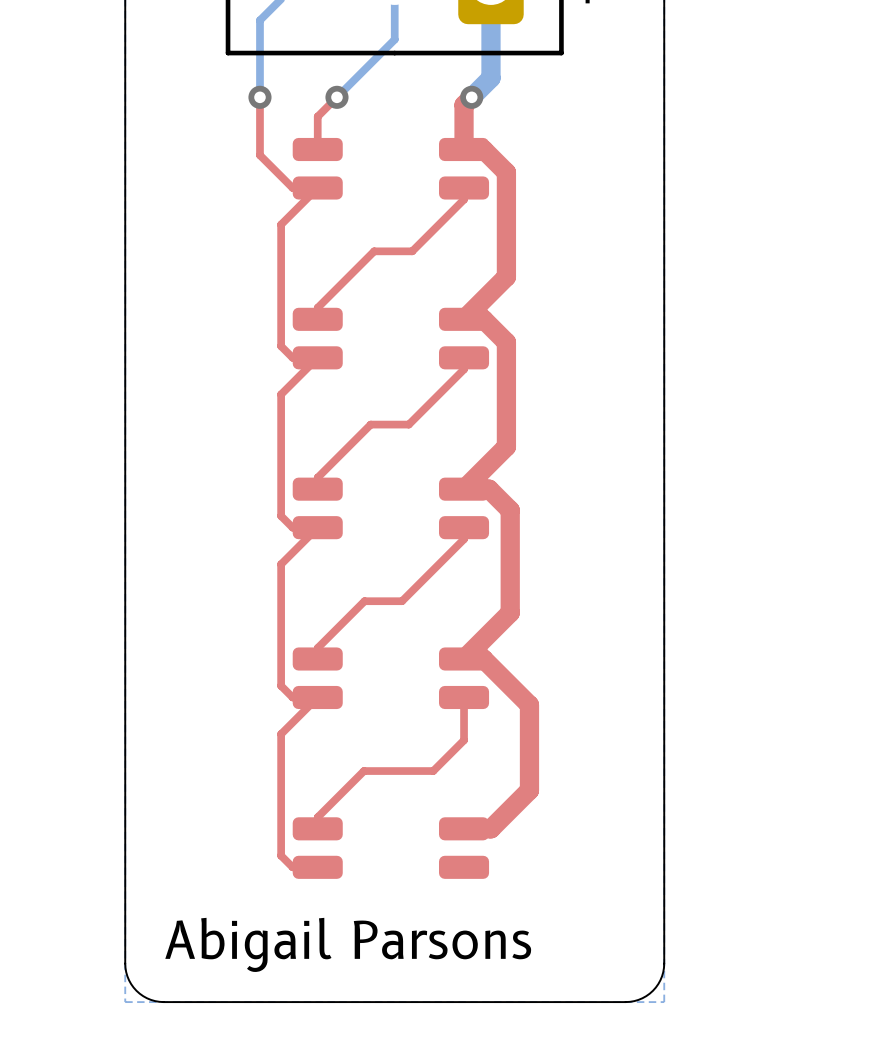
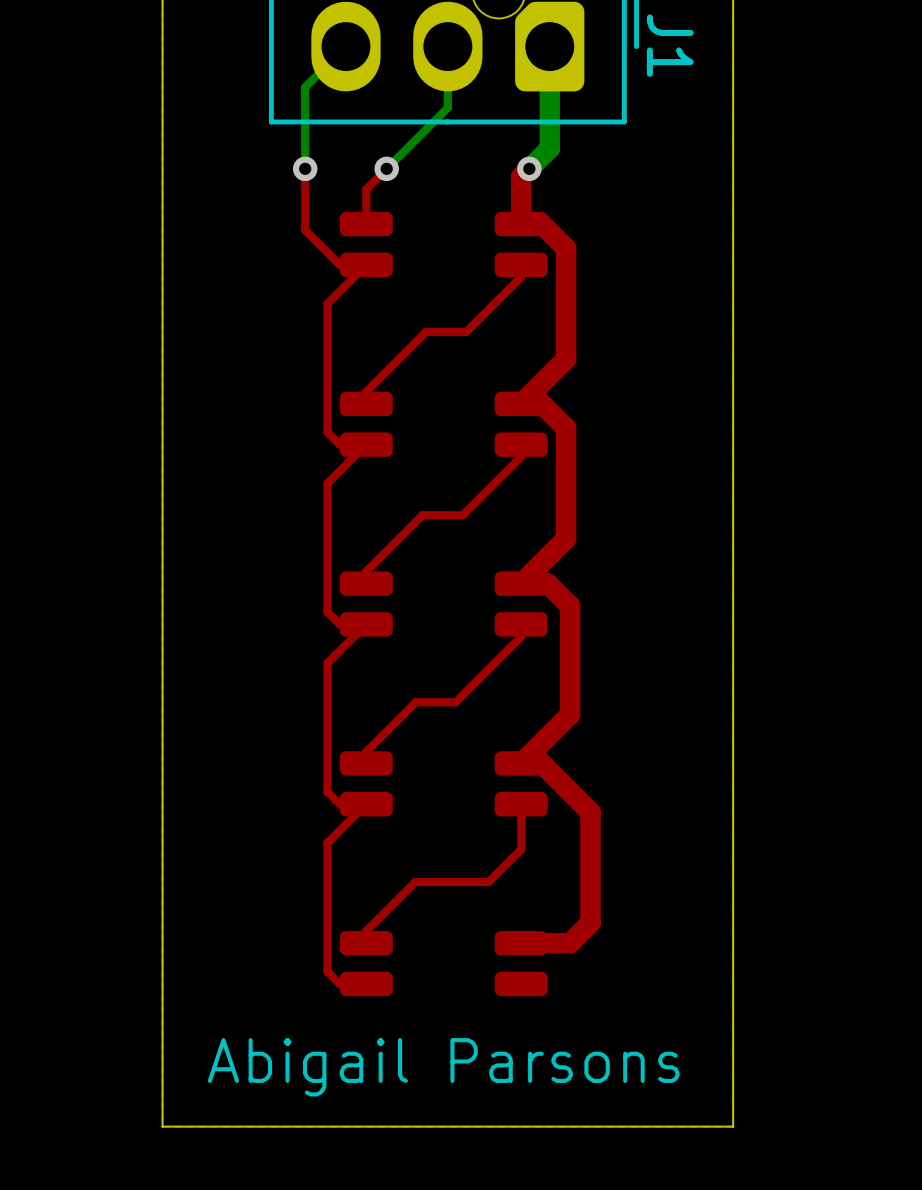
top track: (529, 790) (490, 828) -> (590, 902) (590, 922) (570, 943) (549, 943)
board edge: (125, 963) (129, 980) (136, 990) (147, 998) (163, 1002) -> (162, 1085) (162, 1126) (203, 1126)
board edge: (664, 963) (662, 976) (652, 990) (638, 999) (625, 1002) -> (733, 1085) (733, 1126) (692, 1126)

